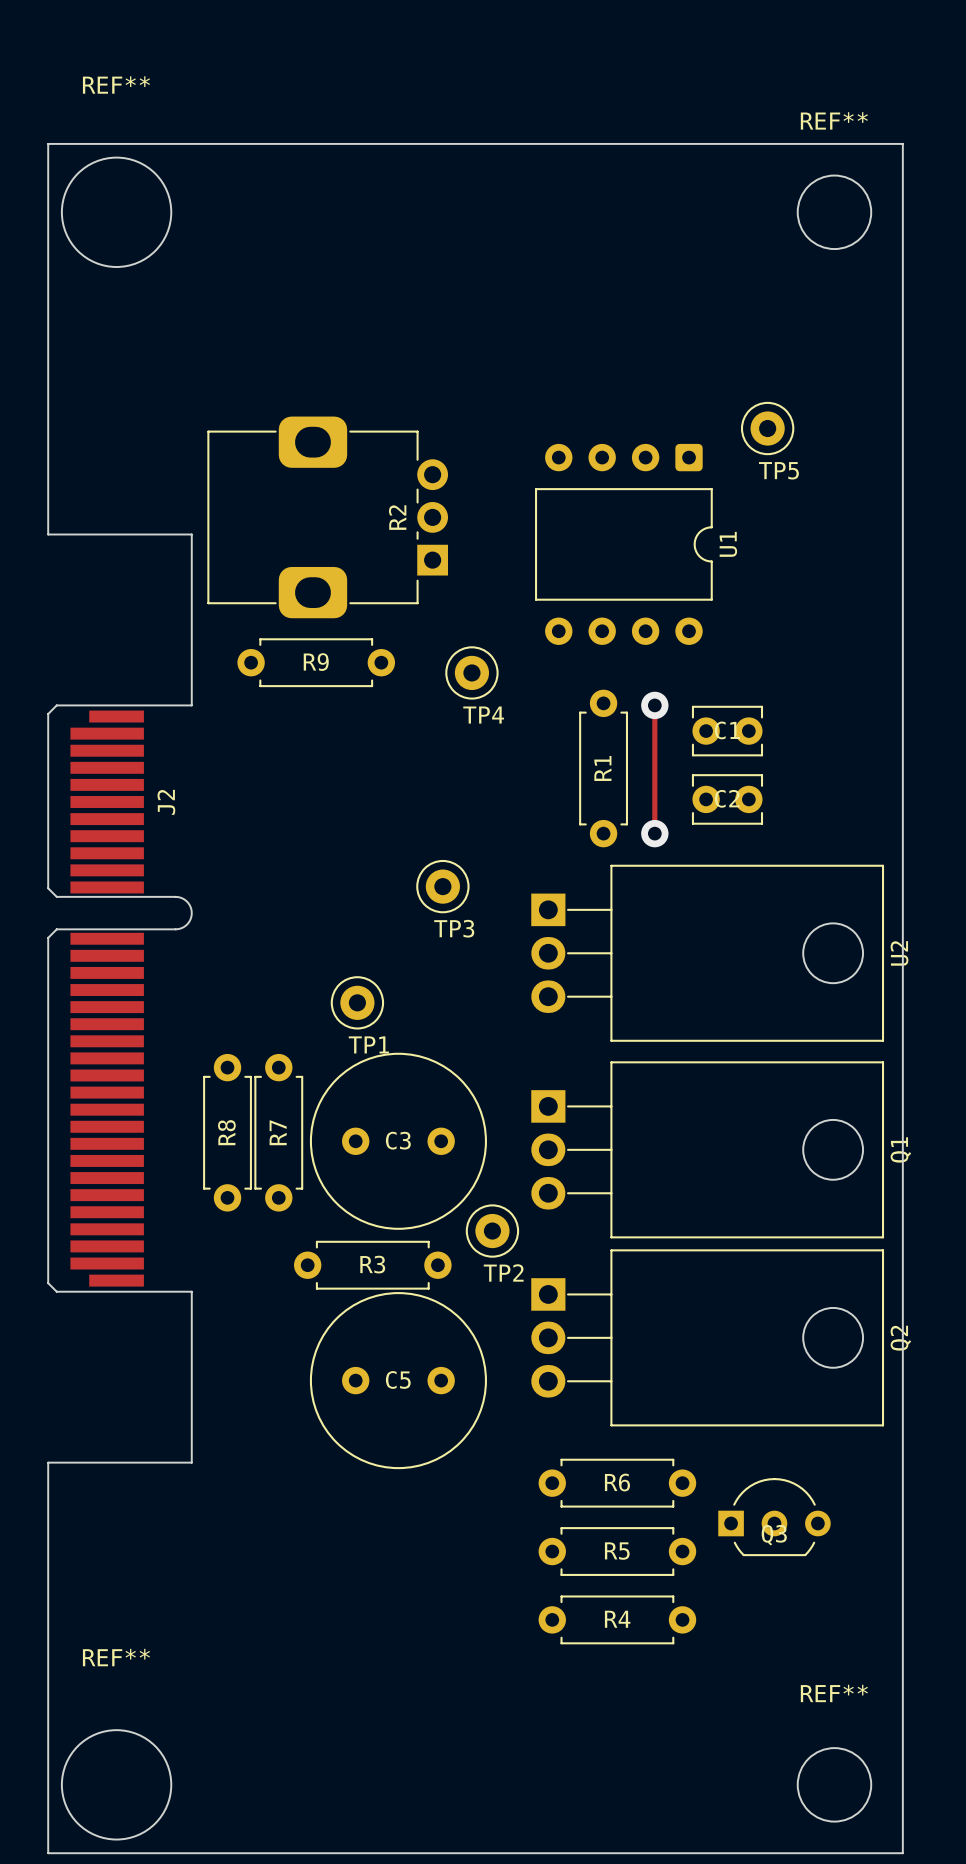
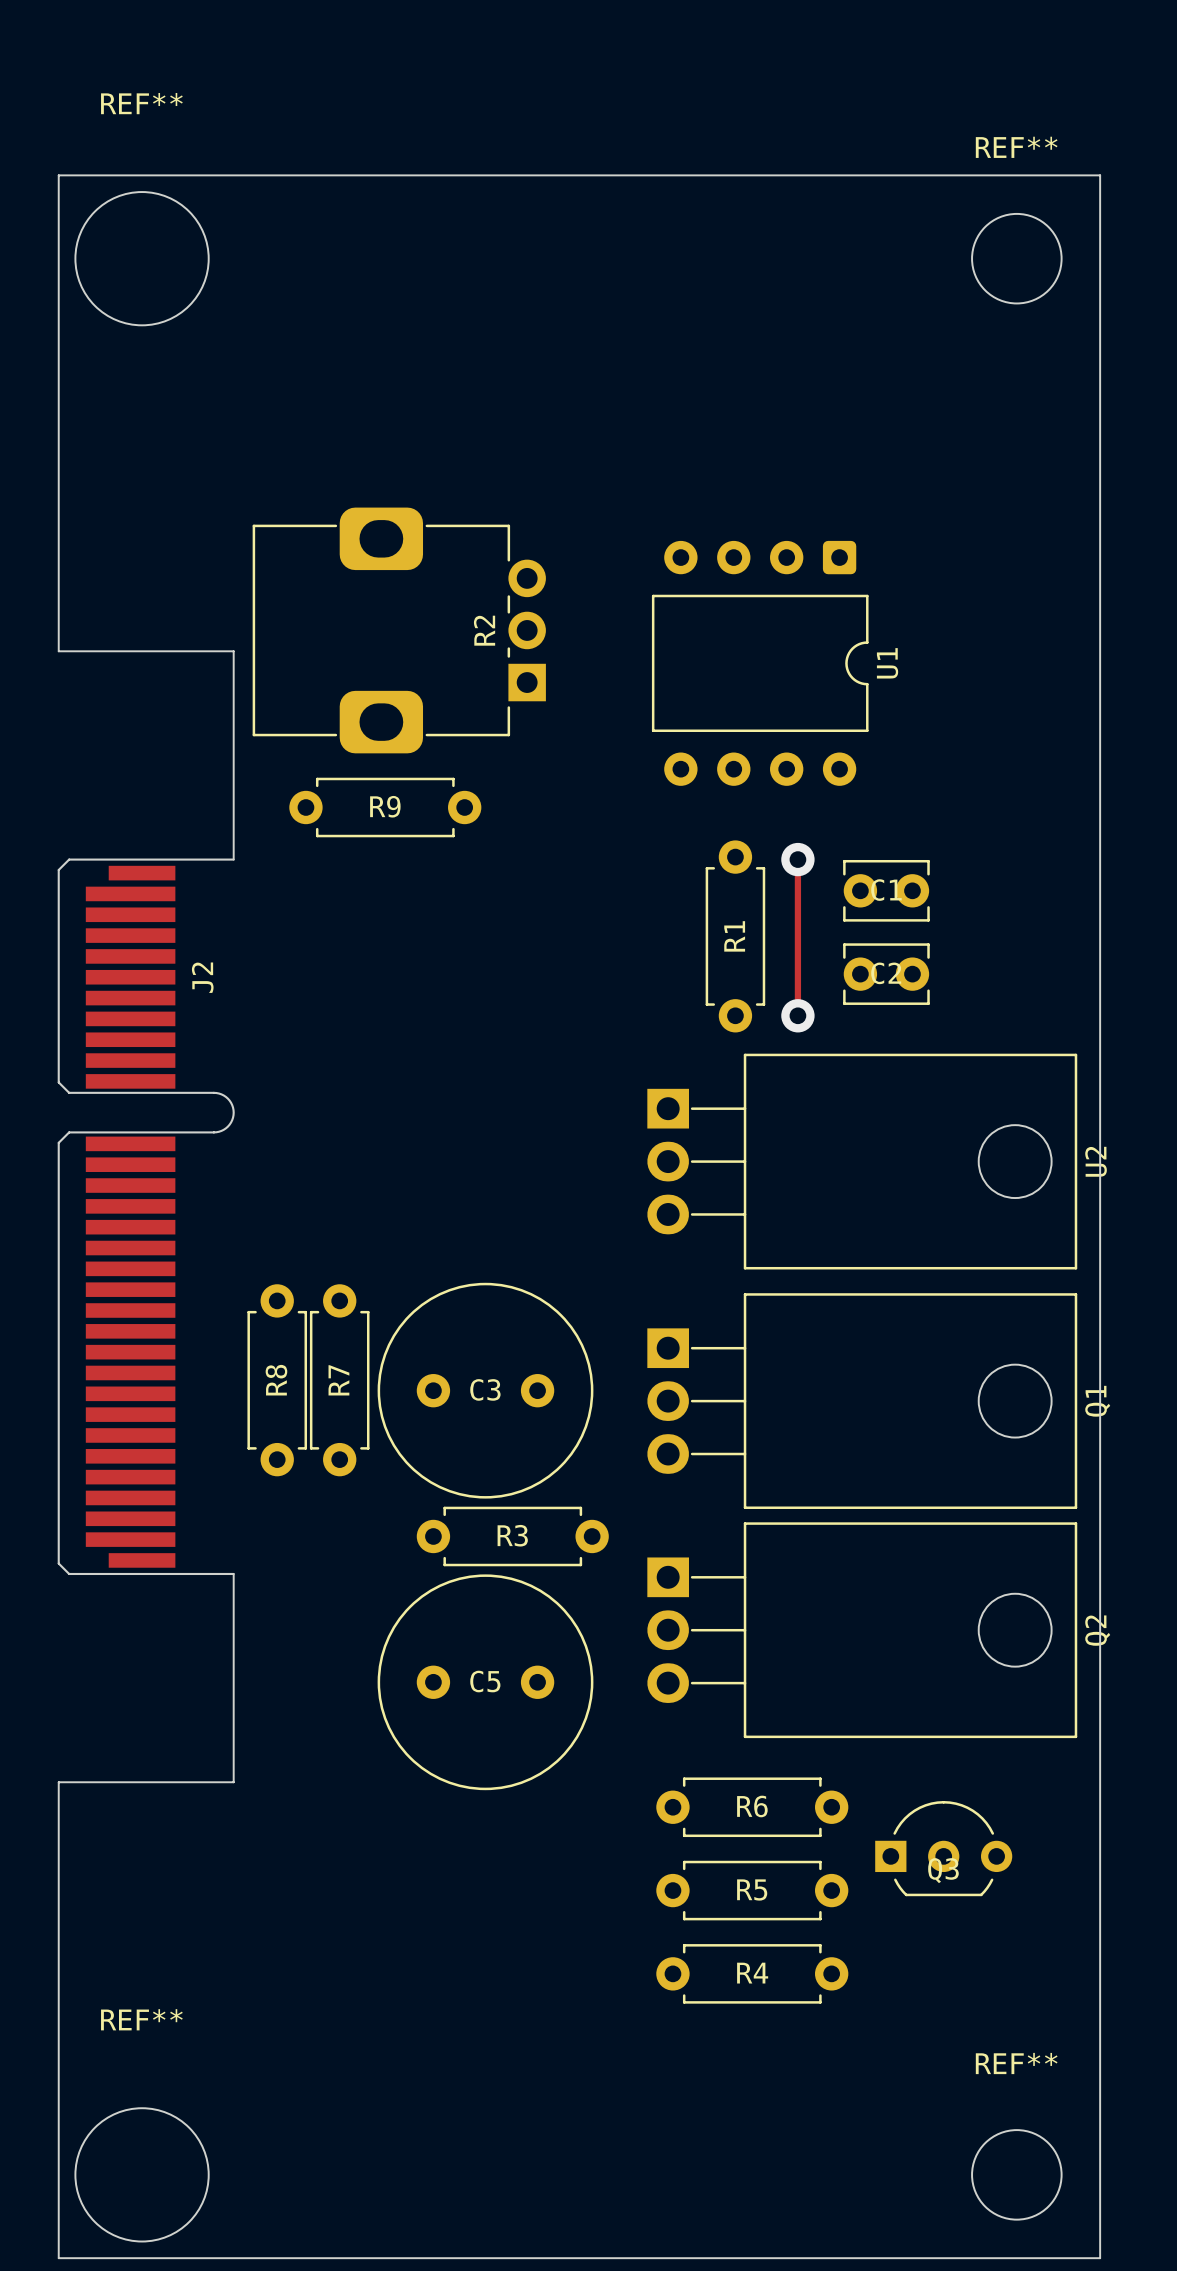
TP5: (767, 428) -> none
TP4: (471, 672) -> none
TP3: (442, 886) -> none
TP1: (357, 1002) -> none
TP2: (492, 1231) -> none
R3 position: (372, 1265) -> (512, 1536)

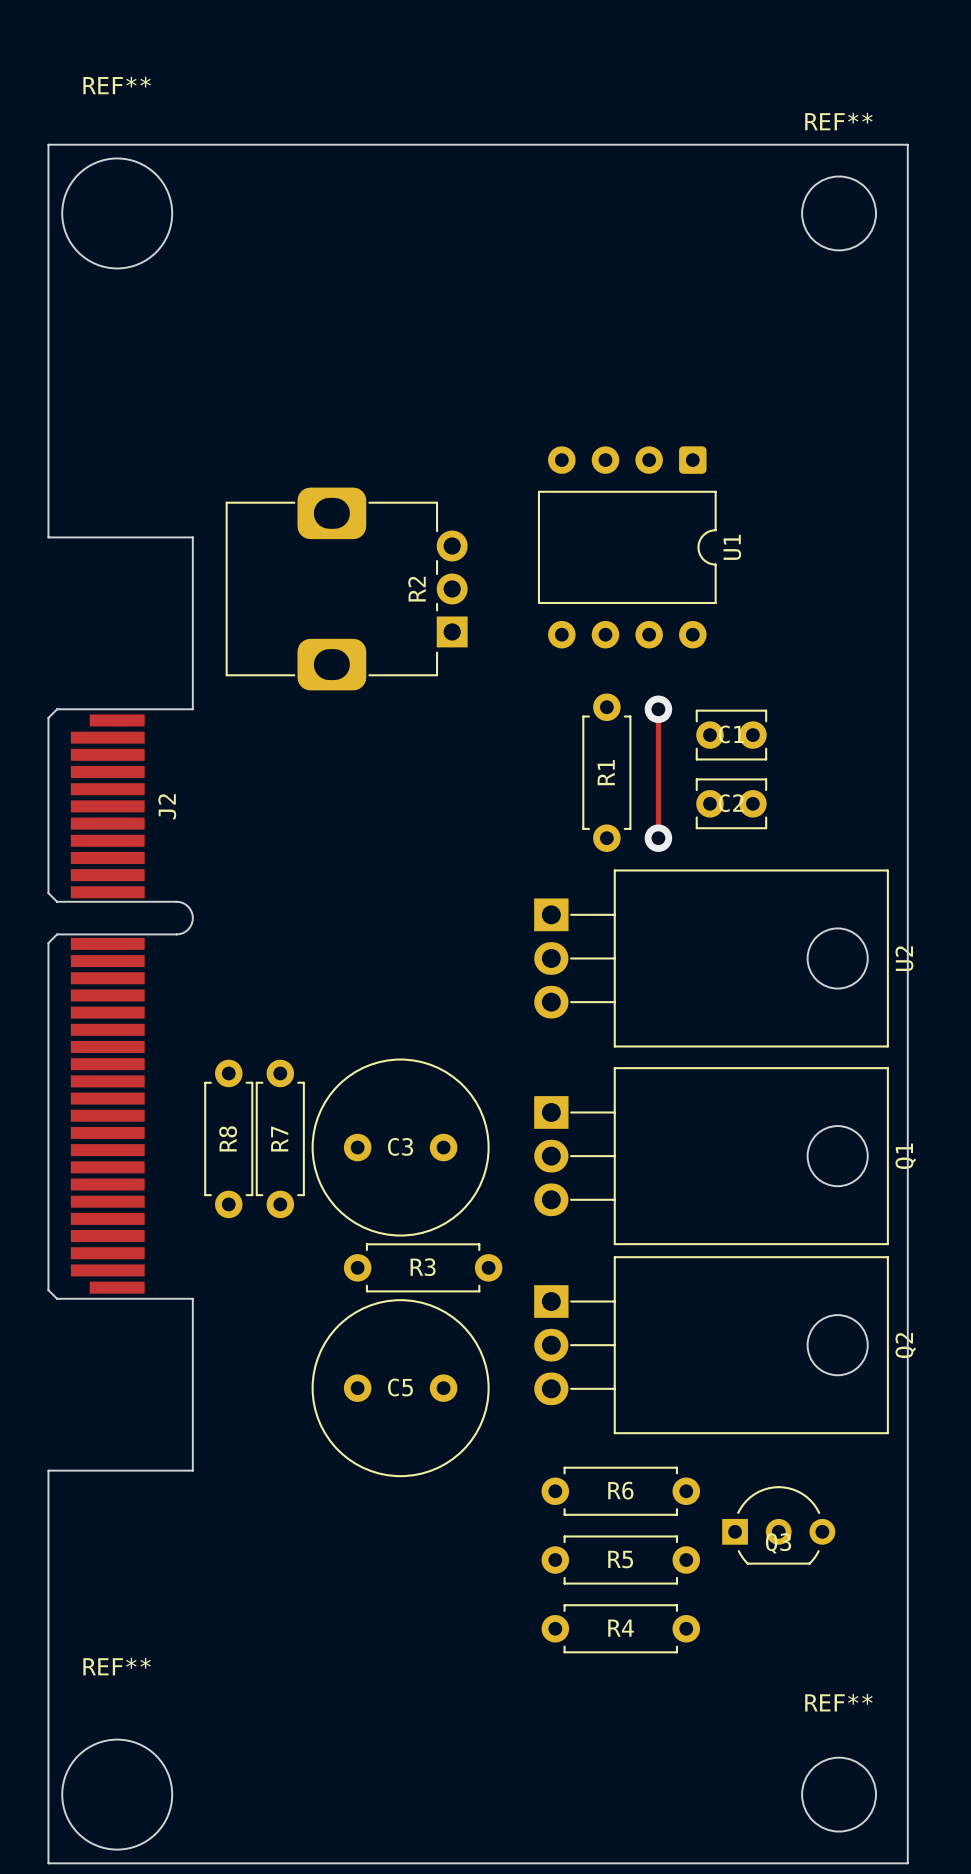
R2 position: (399, 630) -> (346, 588)
R9: (385, 807) -> none

